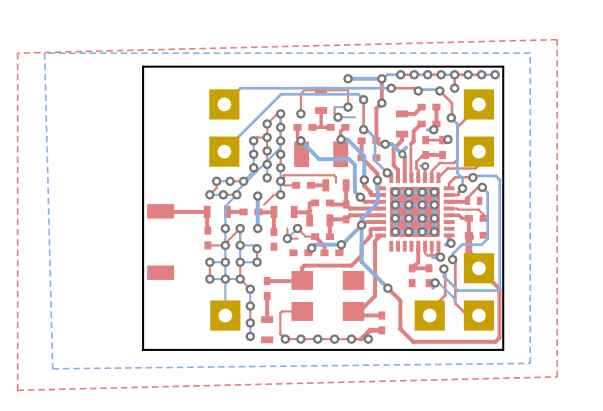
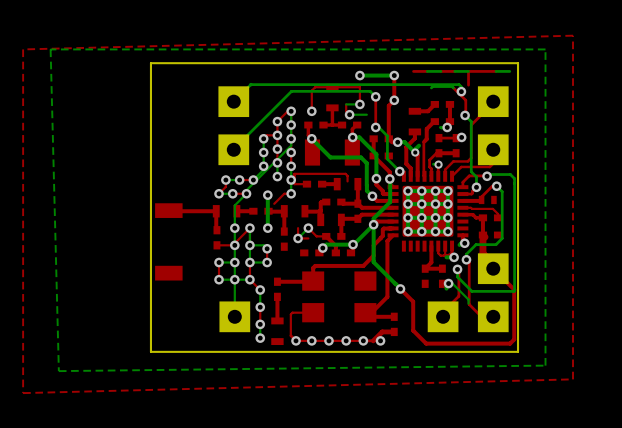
bottom track: (400, 74) (387, 74) (381, 78) -> none
via: (400, 74) -> none
via: (414, 74) -> none
via: (427, 74) -> none
via: (441, 74) -> none
via: (454, 74) -> none
via: (468, 74) -> none
via: (481, 74) -> none
via: (495, 74) -> none
bottom track: (391, 88) (240, 88) -> (461, 91) (459, 84) (250, 85)
top track: (391, 88) (415, 88) (418, 90) -> none
via: (391, 88) -> none
via: (454, 88) -> none
via: (418, 90) -> none
via: (439, 90) -> none
via: none -> (461, 91)

